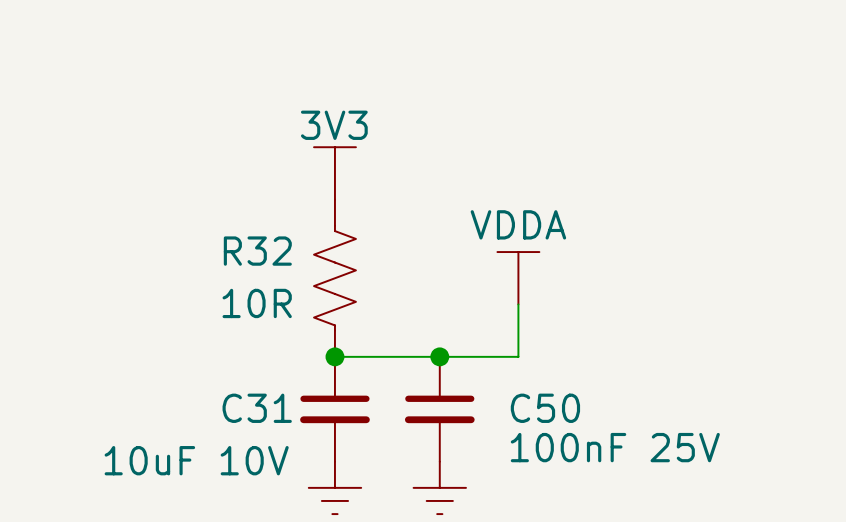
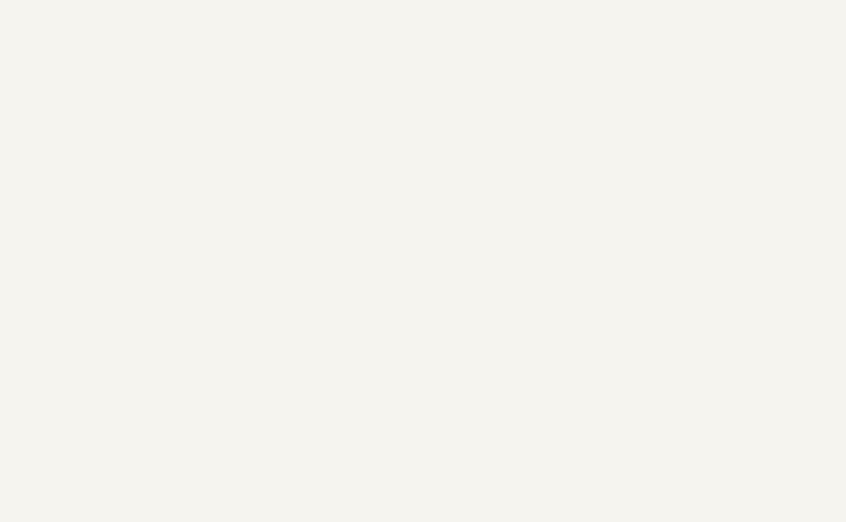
power symbol: 3V3 (334, 173) -> none
R32: 10R (334, 278) -> none
power symbol: VDDA (518, 278) -> none
wire: (518, 304) (518, 356) (334, 356) -> none
junction: (334, 356) -> none
junction: (439, 356) -> none
C31: 10uF 10V (334, 409) -> none
C50: 100nF 25V (439, 409) -> none
power symbol: (334, 487) -> none
power symbol: (439, 487) -> none

